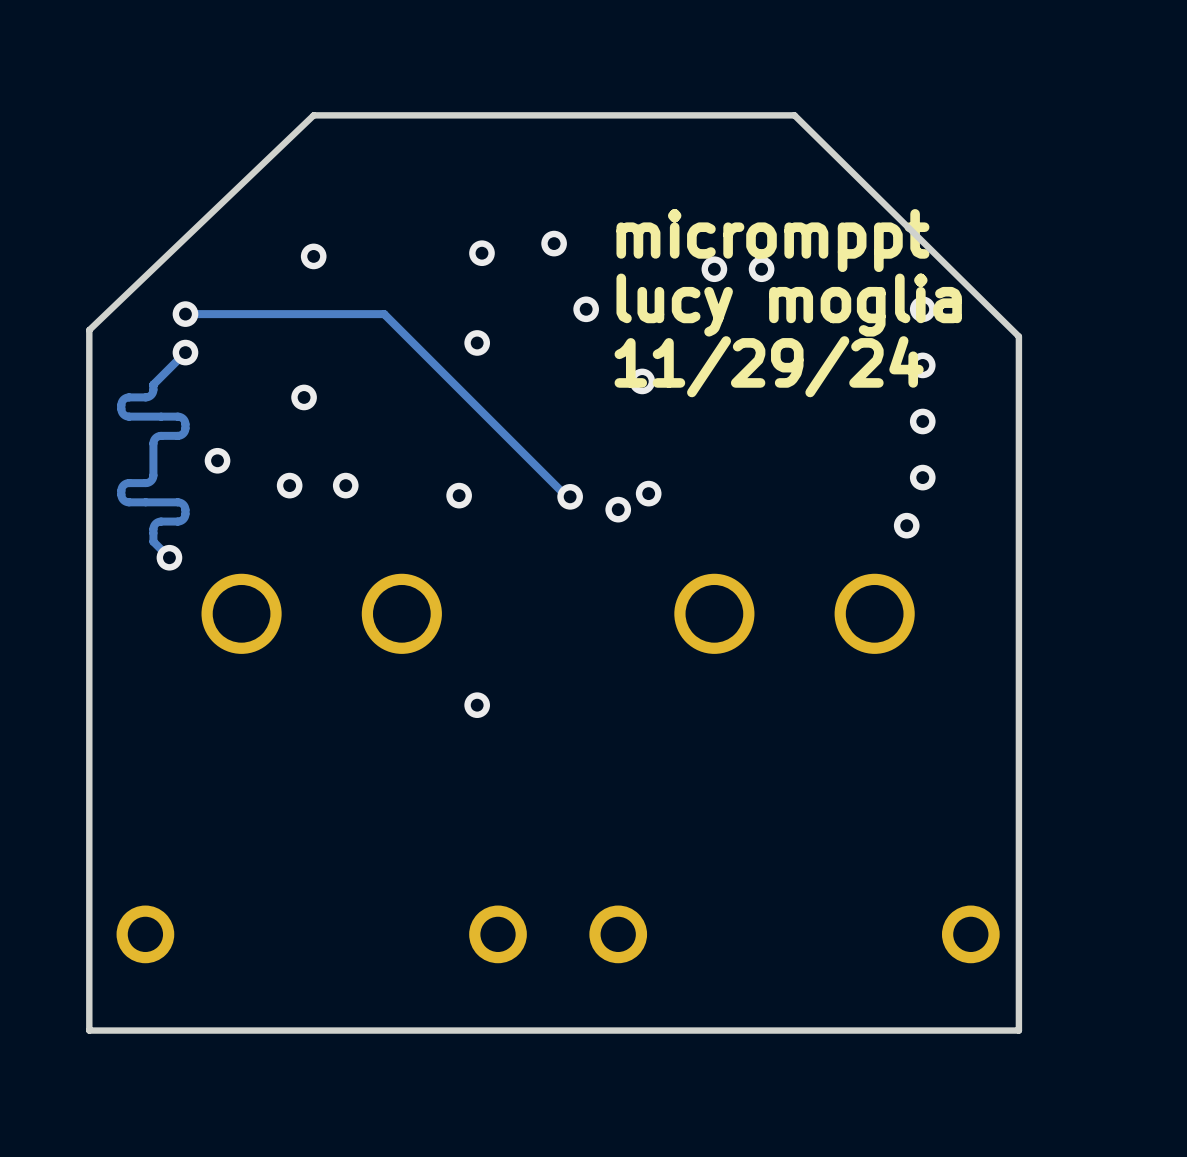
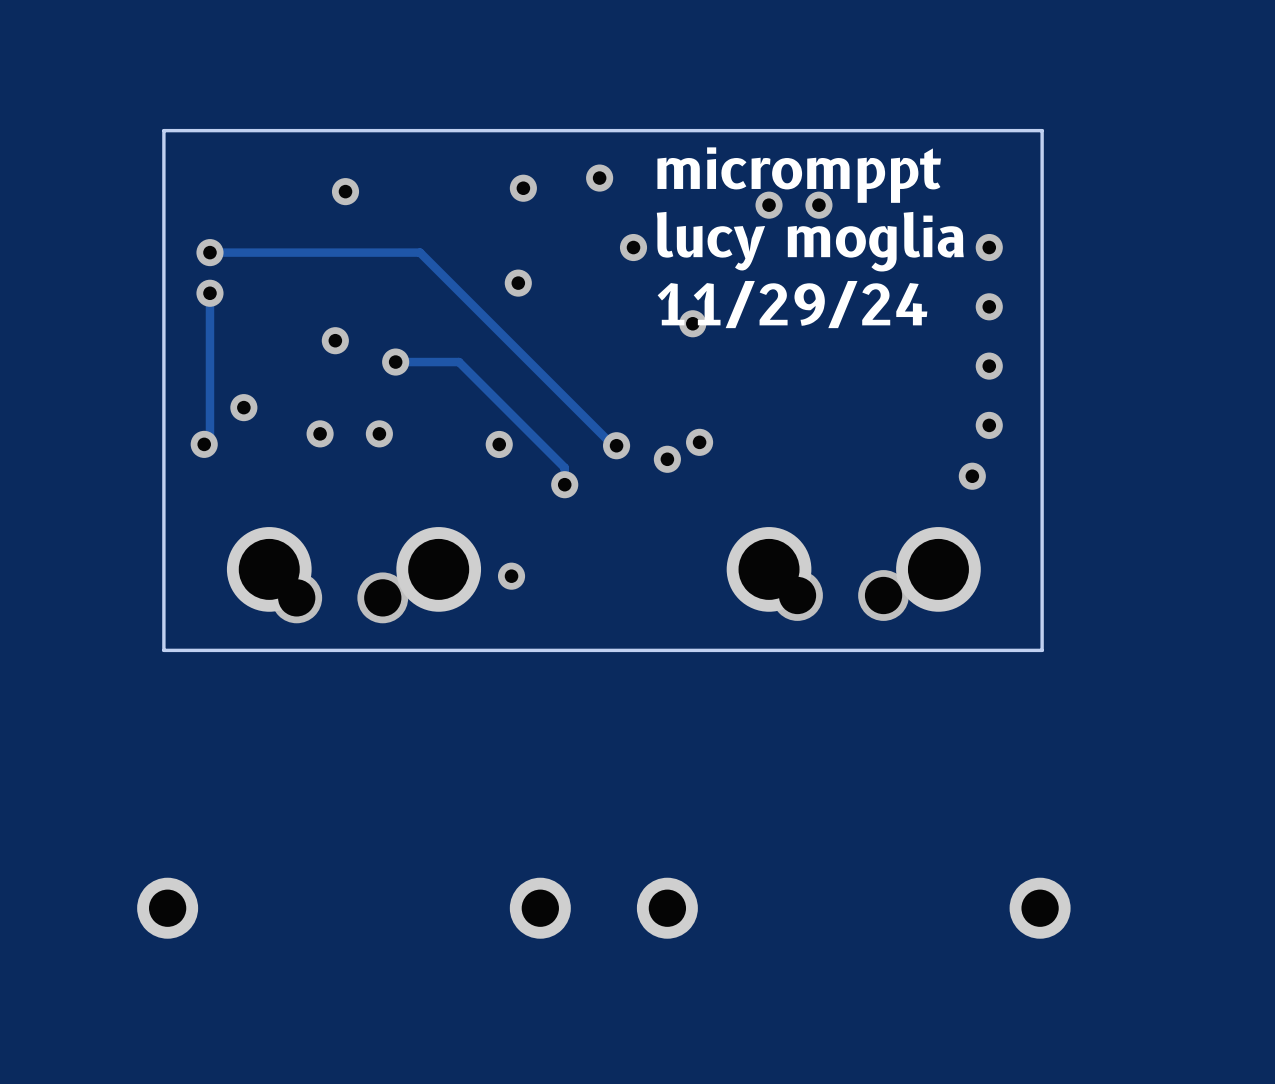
board edge: (794, 115) (1018, 336) (1018, 1030) (89, 1030) (89, 330) (313, 115) (794, 115) -> none
board edge: none -> (1042, 130) (163, 130) (163, 650) (1042, 650) (1042, 130)
track: (185, 352) (153, 384) (153, 391) (150, 395) (126, 397) (121, 405) (122, 412) (126, 416) (178, 416) (183, 419) (185, 424) -> (209, 293) (209, 369)
track: none -> (395, 362) (459, 362) (564, 467) (564, 484)
via: none -> (395, 362)
track: (185, 428) (180, 435) (160, 435) (154, 439) (153, 476) (151, 480) (146, 483) (126, 483) (121, 489) (122, 497) (127, 502) (178, 502) (184, 505) (185, 514) (181, 520) (159, 521) (153, 527) (153, 541) (169, 557) -> (209, 373) (209, 438) (204, 444)
via: none -> (564, 484)
via position: (169, 557) -> (204, 444)
via: none -> (797, 595)
via: none -> (883, 595)
via: none -> (296, 597)
via: none -> (382, 597)
via position: (477, 705) -> (511, 576)

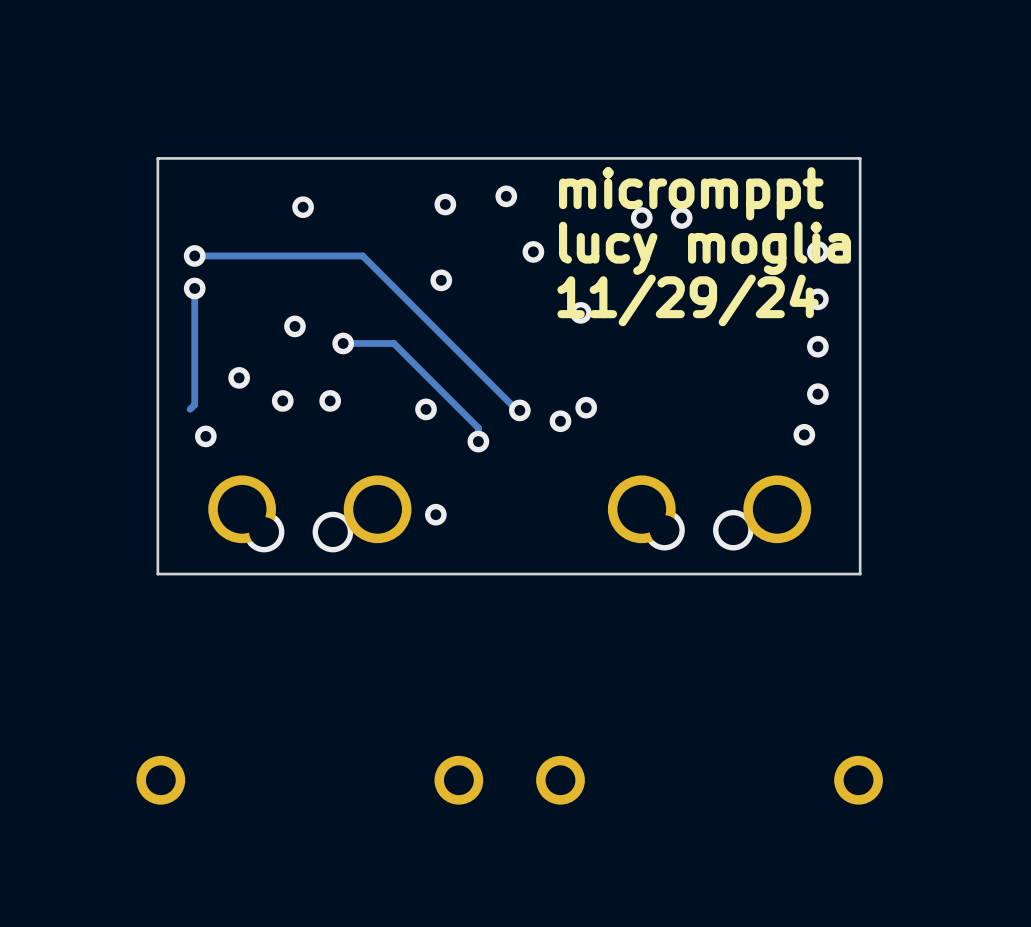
via position: (243, 407) -> (239, 377)
via: (204, 444) -> none
via: none -> (205, 436)

